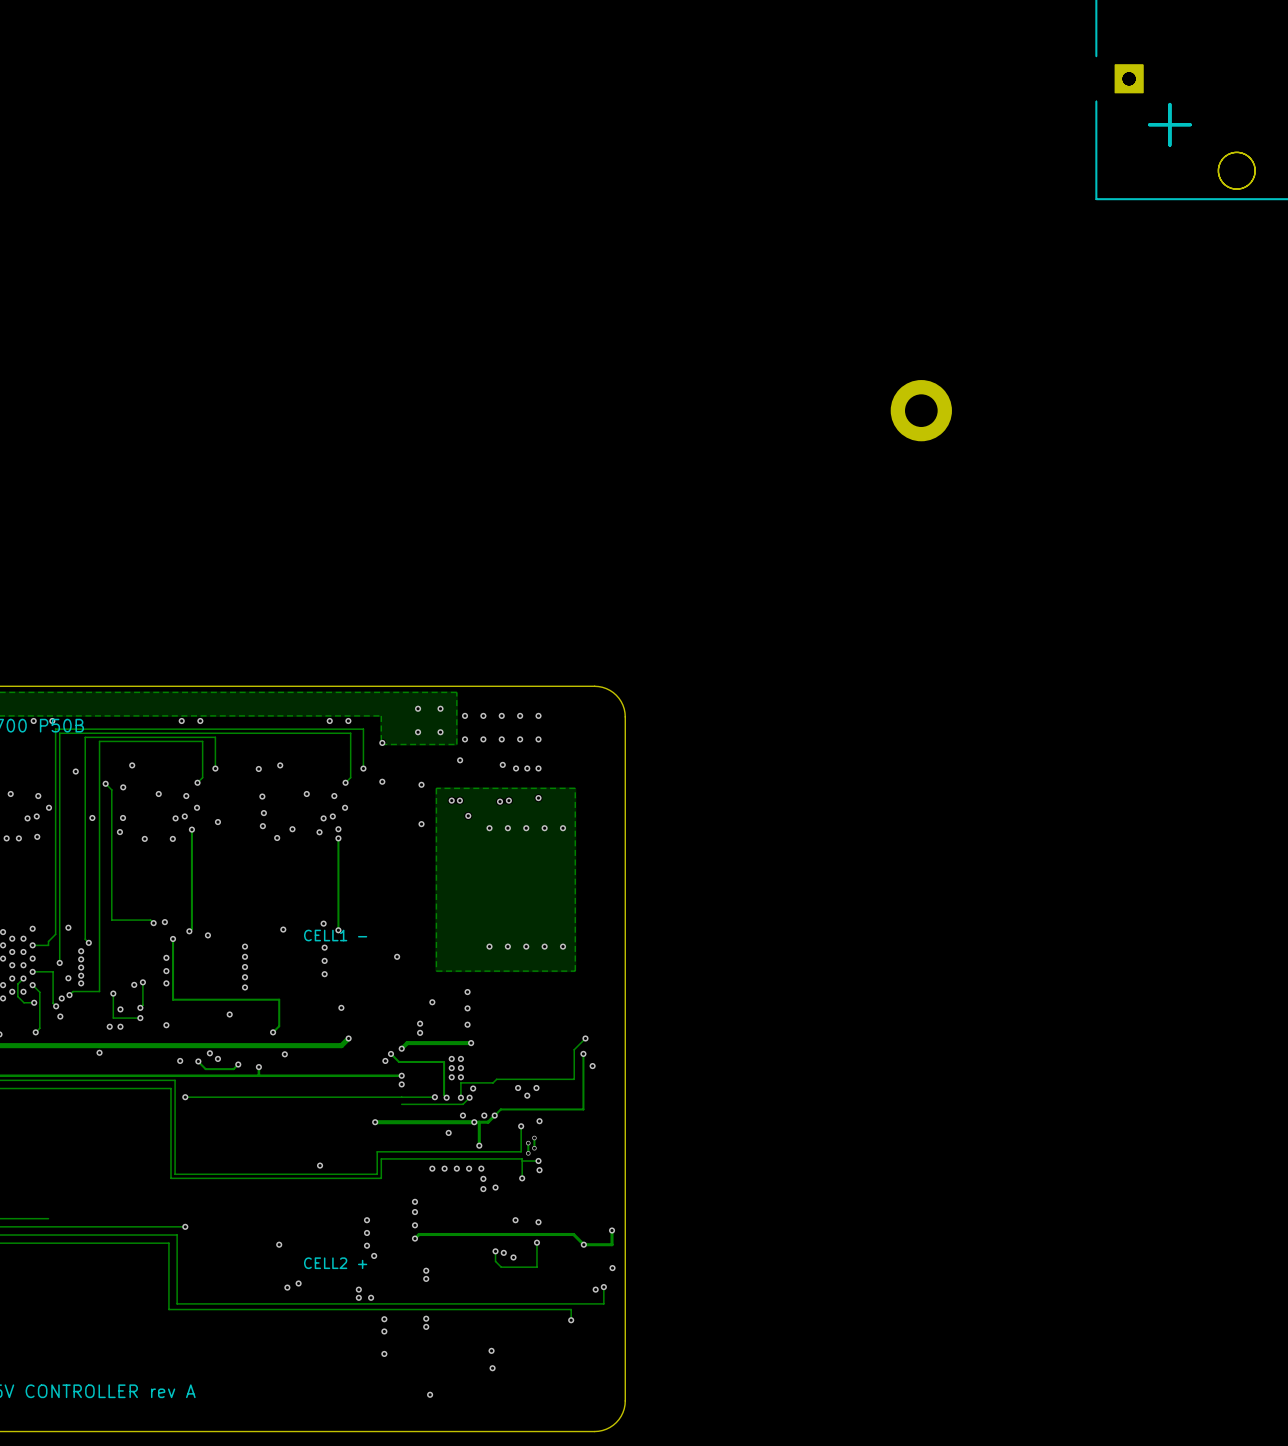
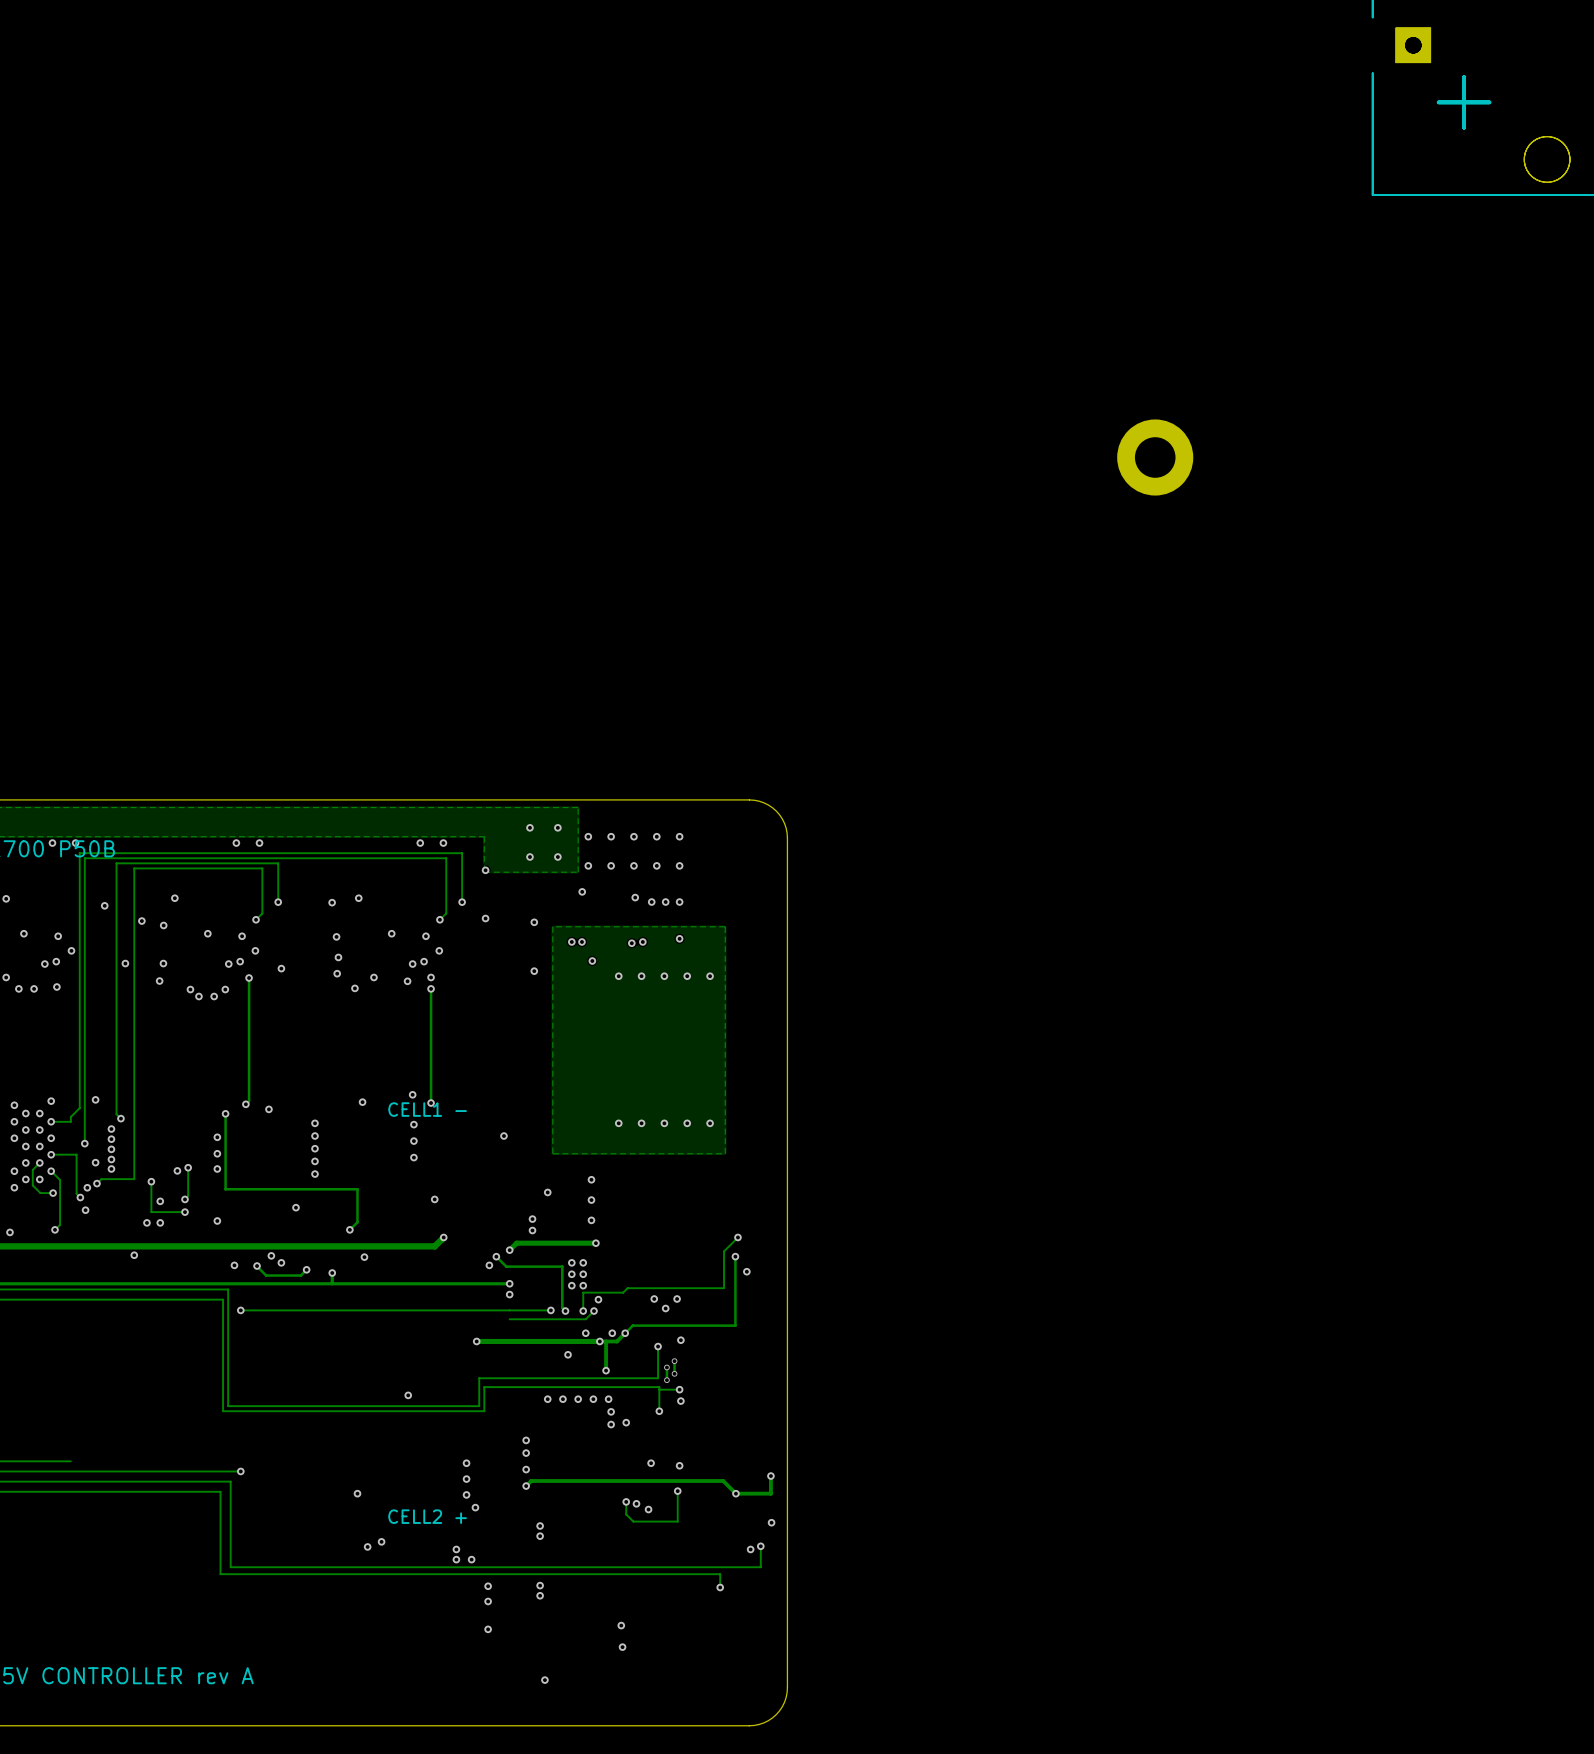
track: (105, 783) (111, 789) (111, 920) (150, 920) (153, 923) -> none
via: none -> (198, 996)
via: none -> (214, 996)
via: (164, 922) -> none
via: (153, 923) -> none

